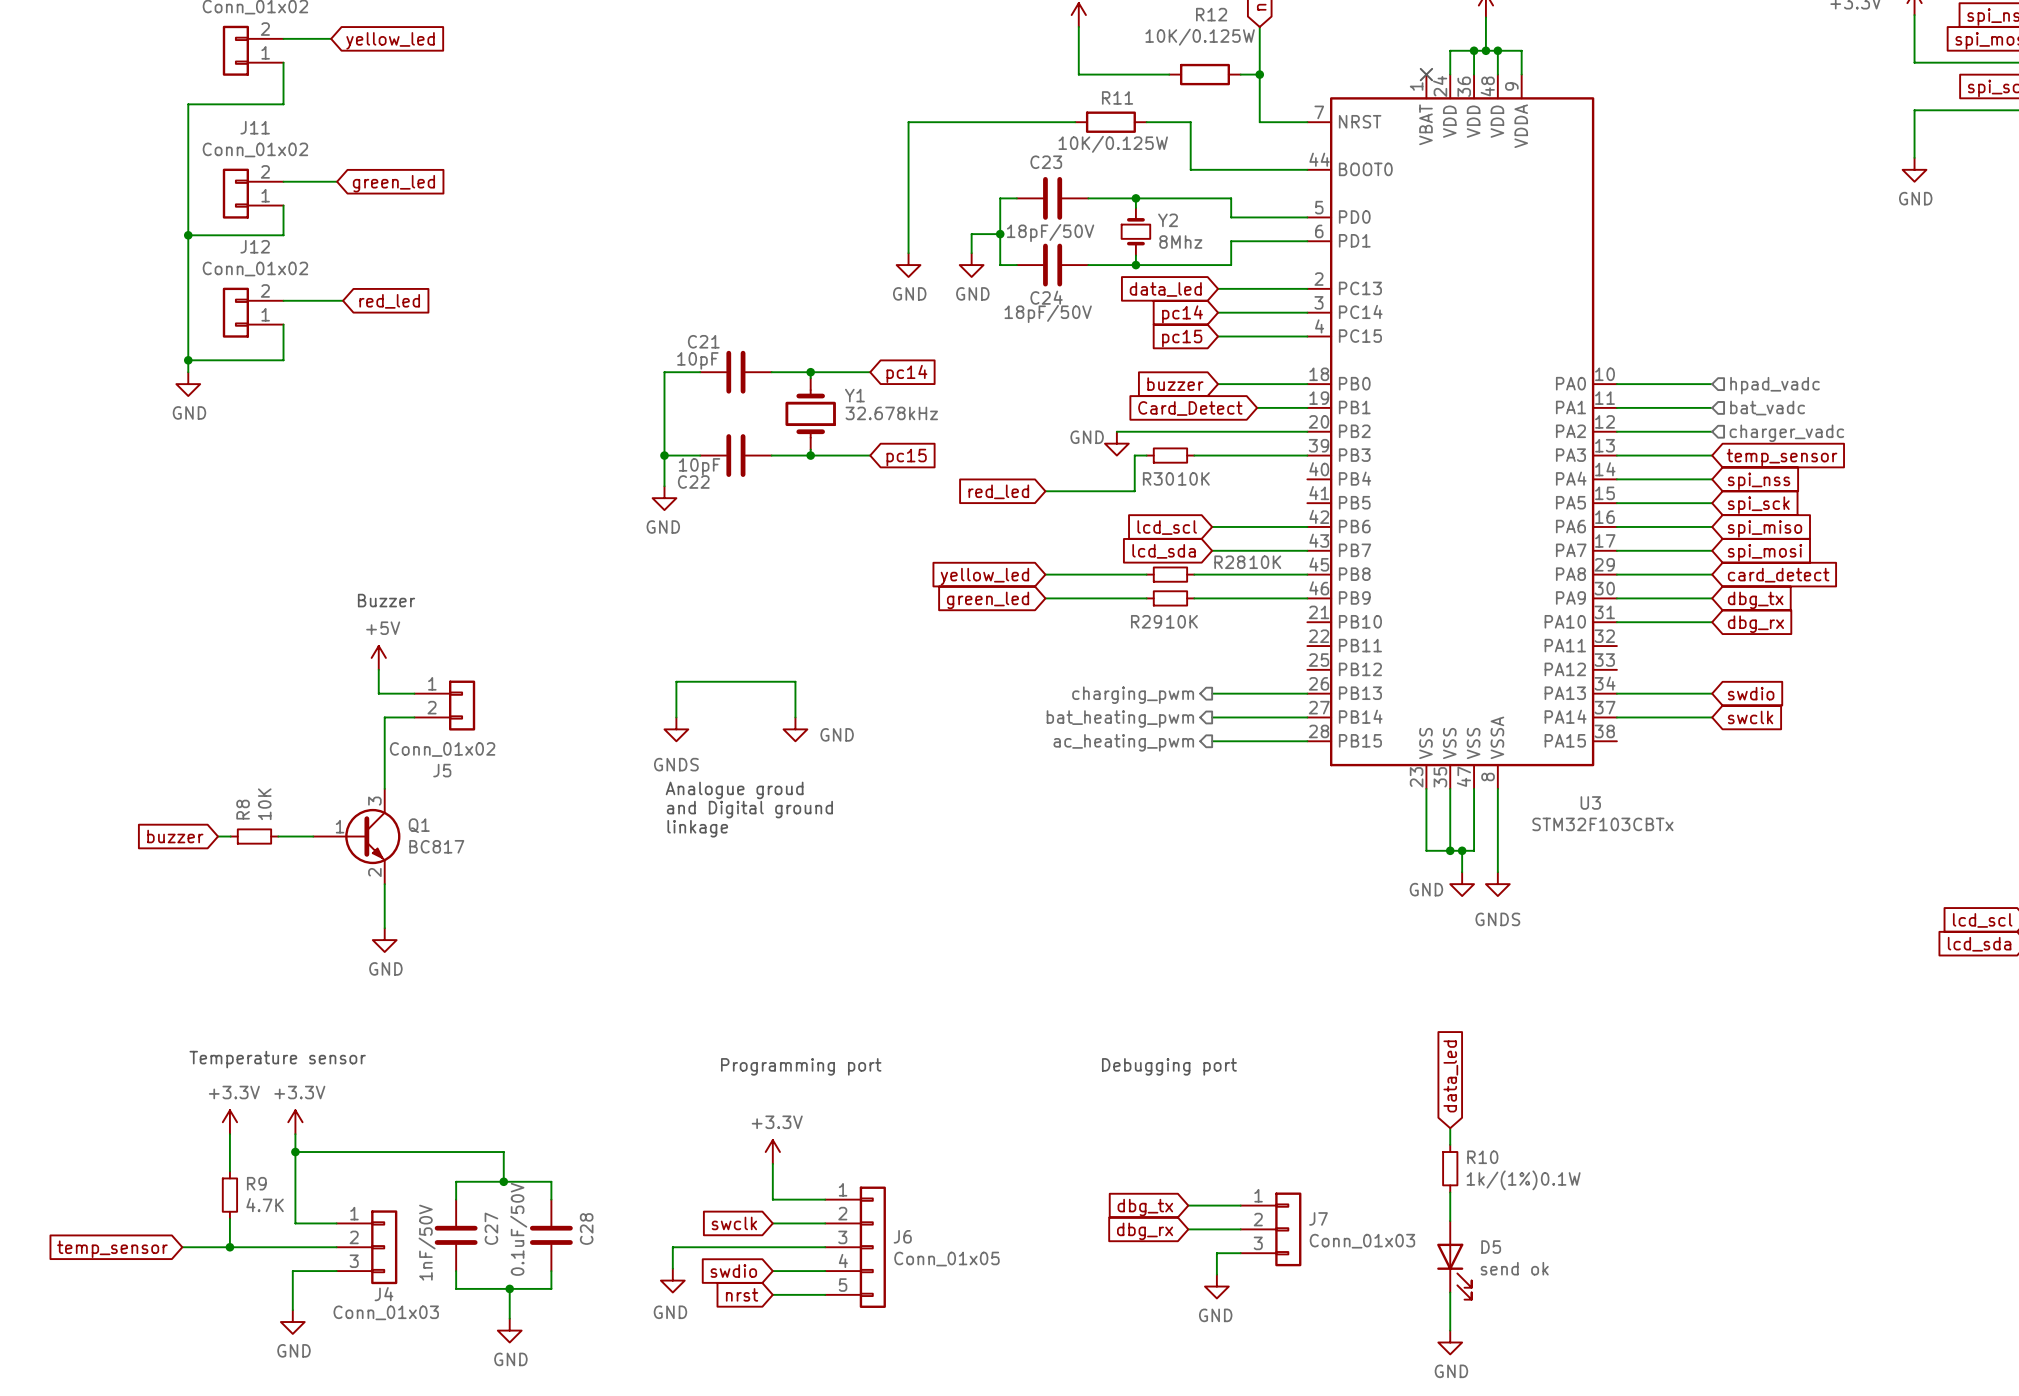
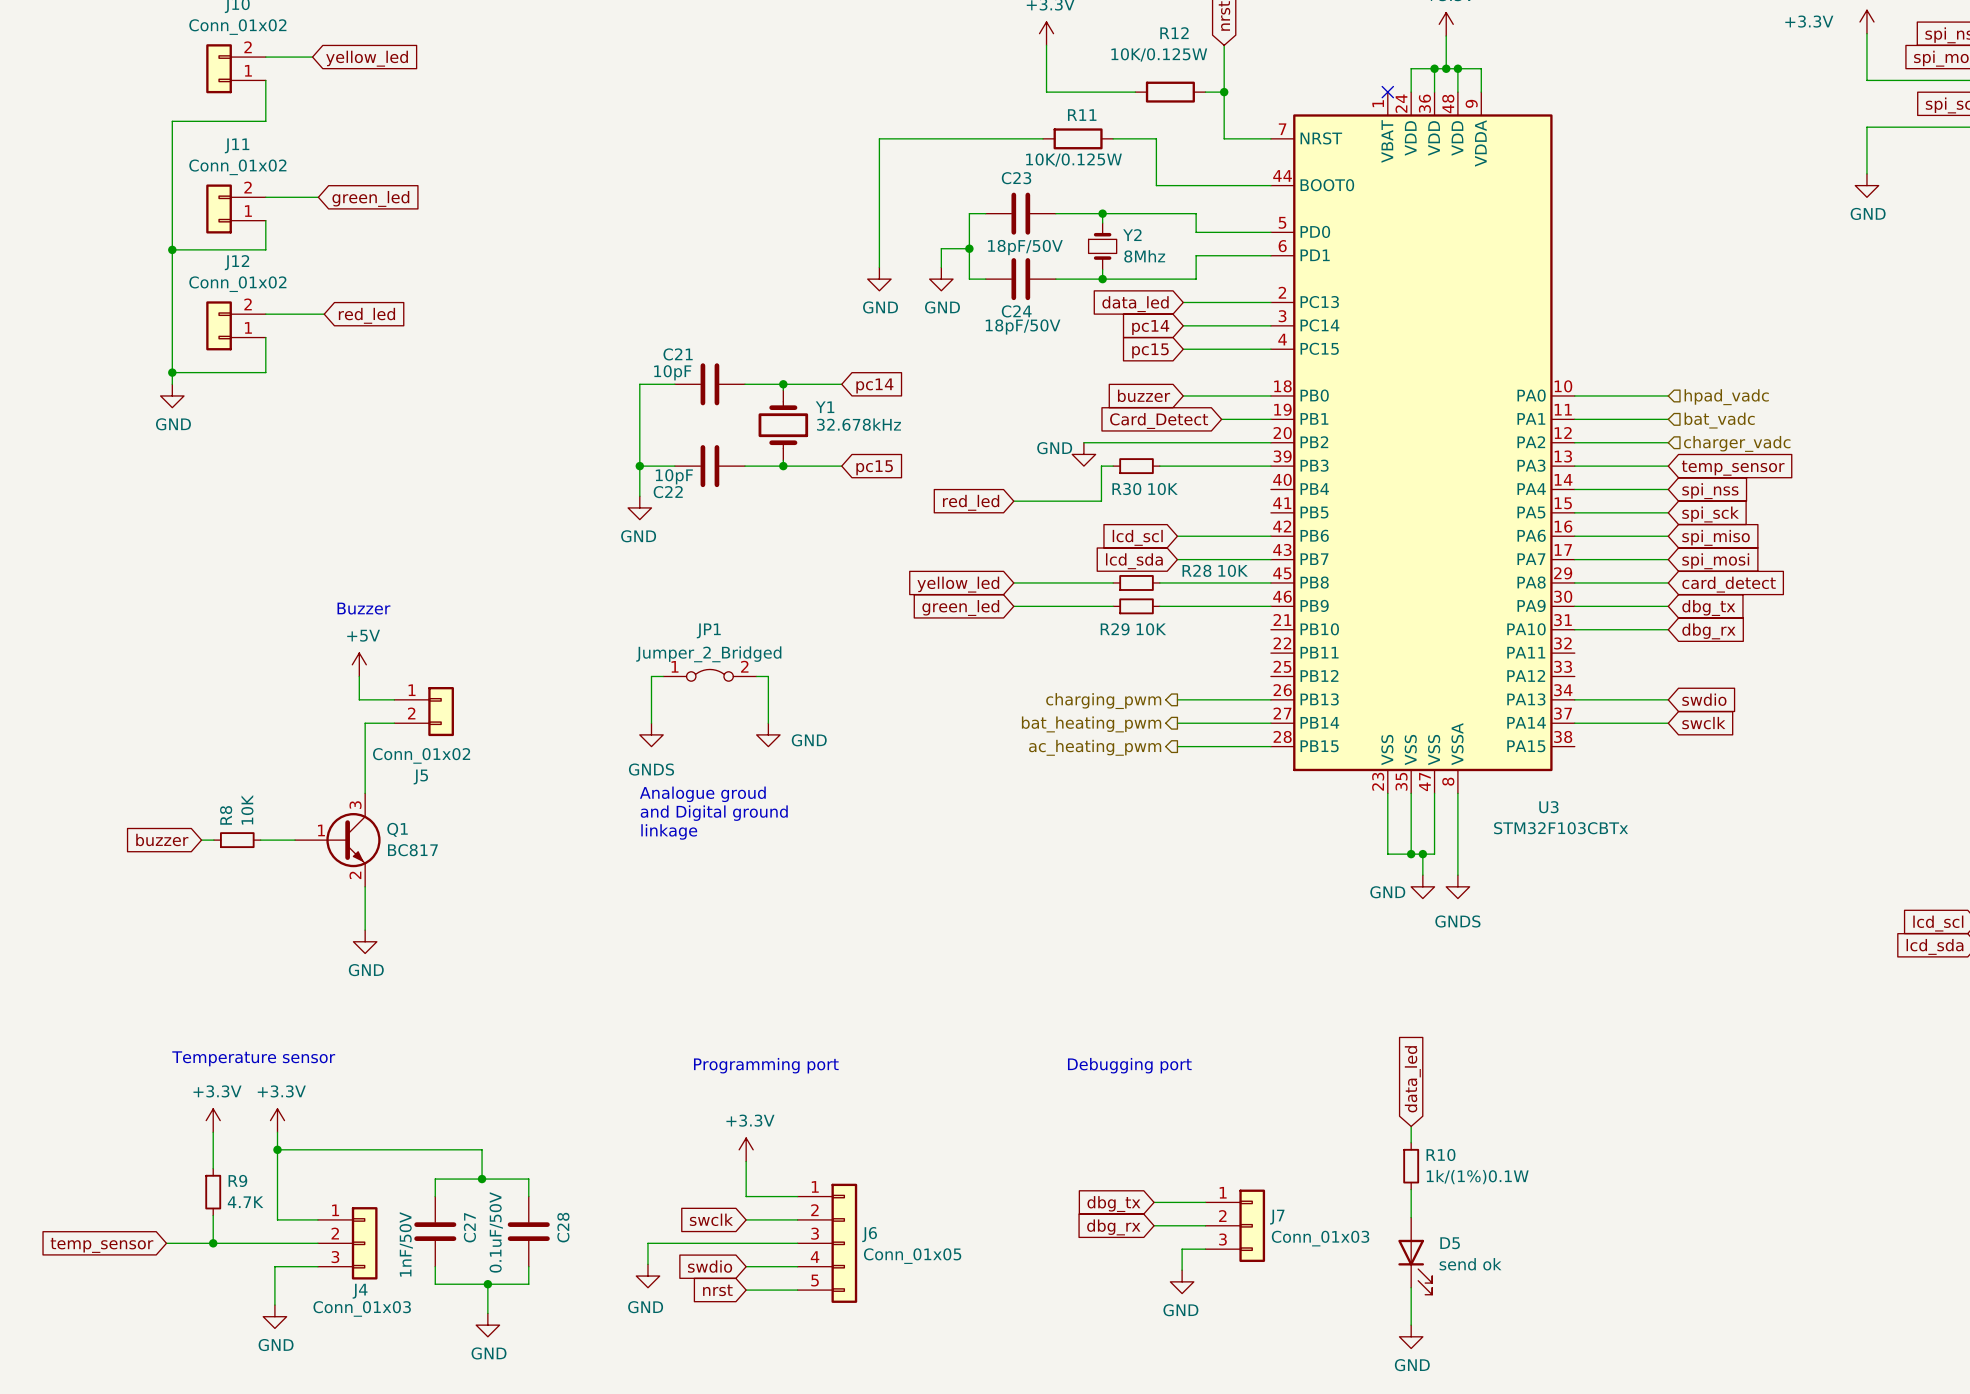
JP1: none -> Jumper_2_Bridged (709, 675)
wire: none -> (756, 676) (768, 676) (768, 688)
wire: (676, 681) (795, 681) -> (651, 688) (651, 676) (663, 676)

